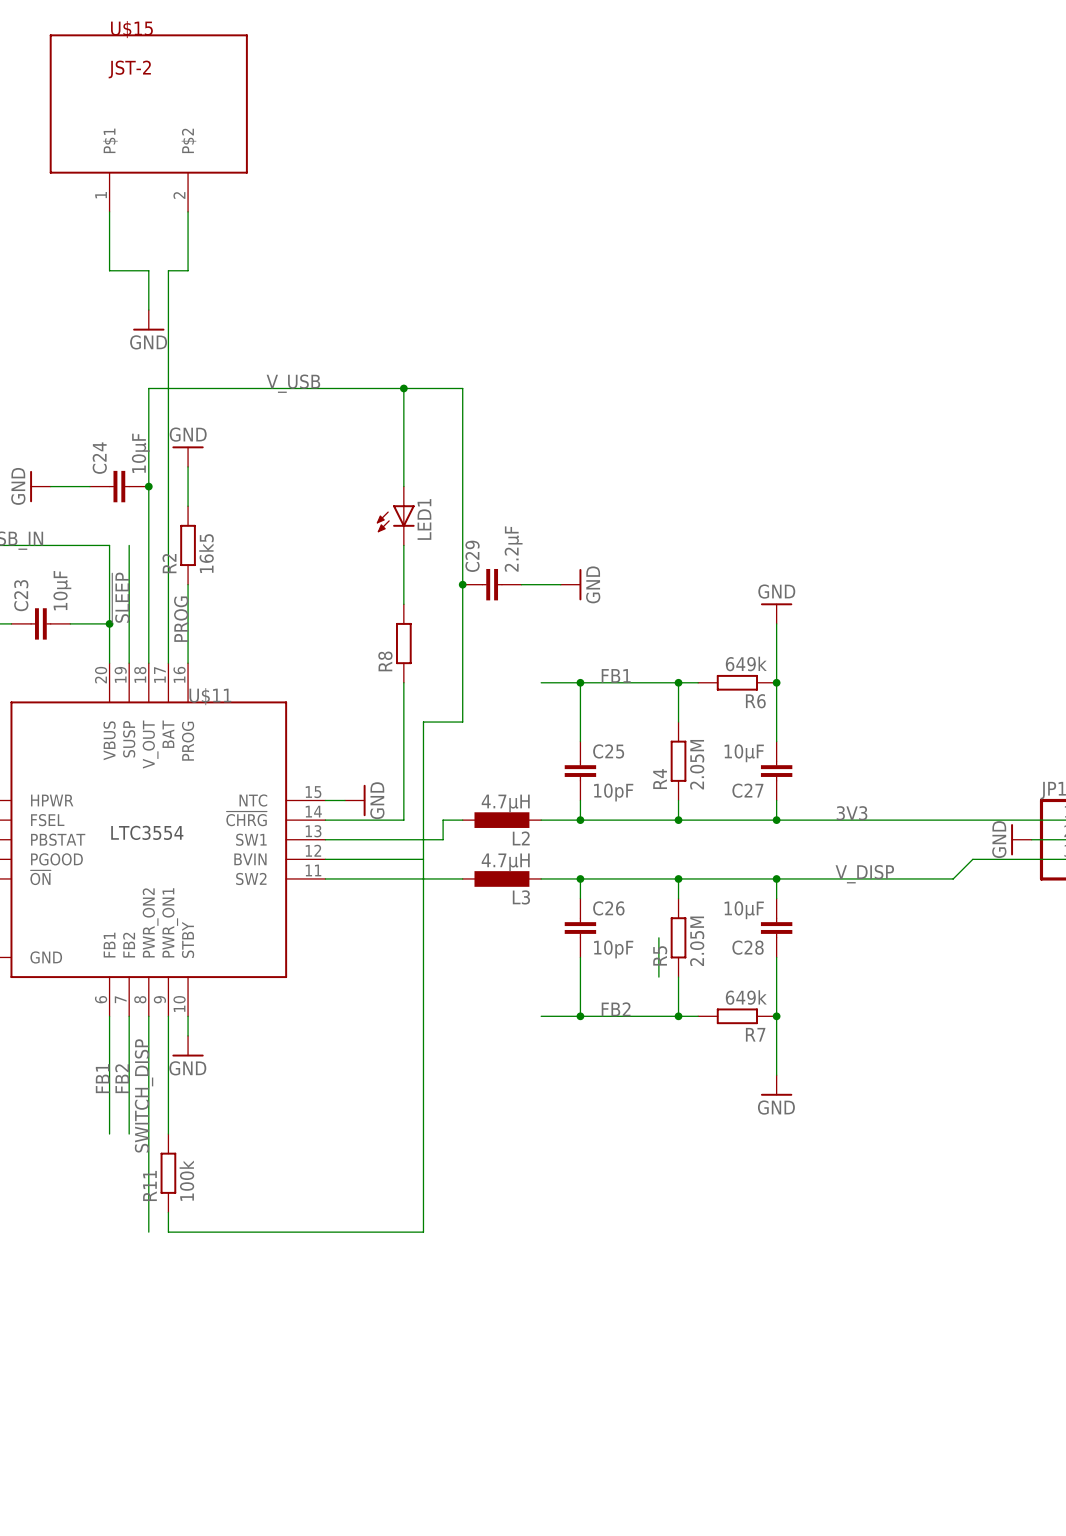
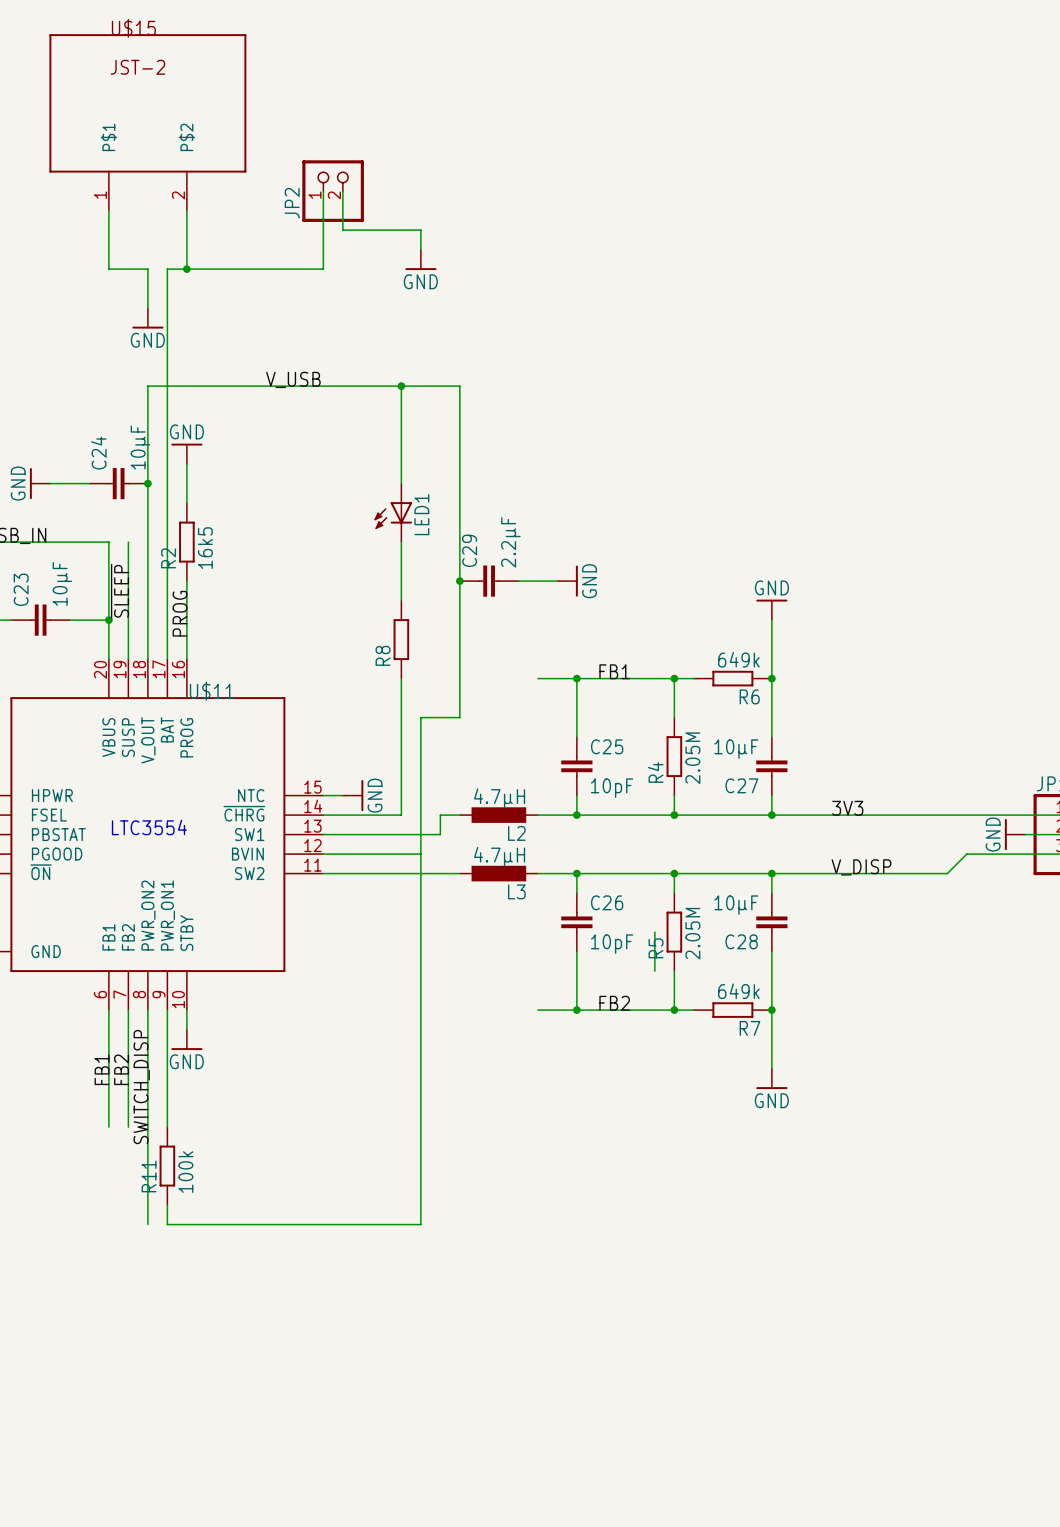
wire: none -> (323, 191) (323, 269) (186, 269)
JP2: none -> (333, 191)
wire: none -> (342, 191) (342, 230) (420, 230) (420, 249)
power symbol: none -> GND (420, 259)
junction: none -> (186, 269)

